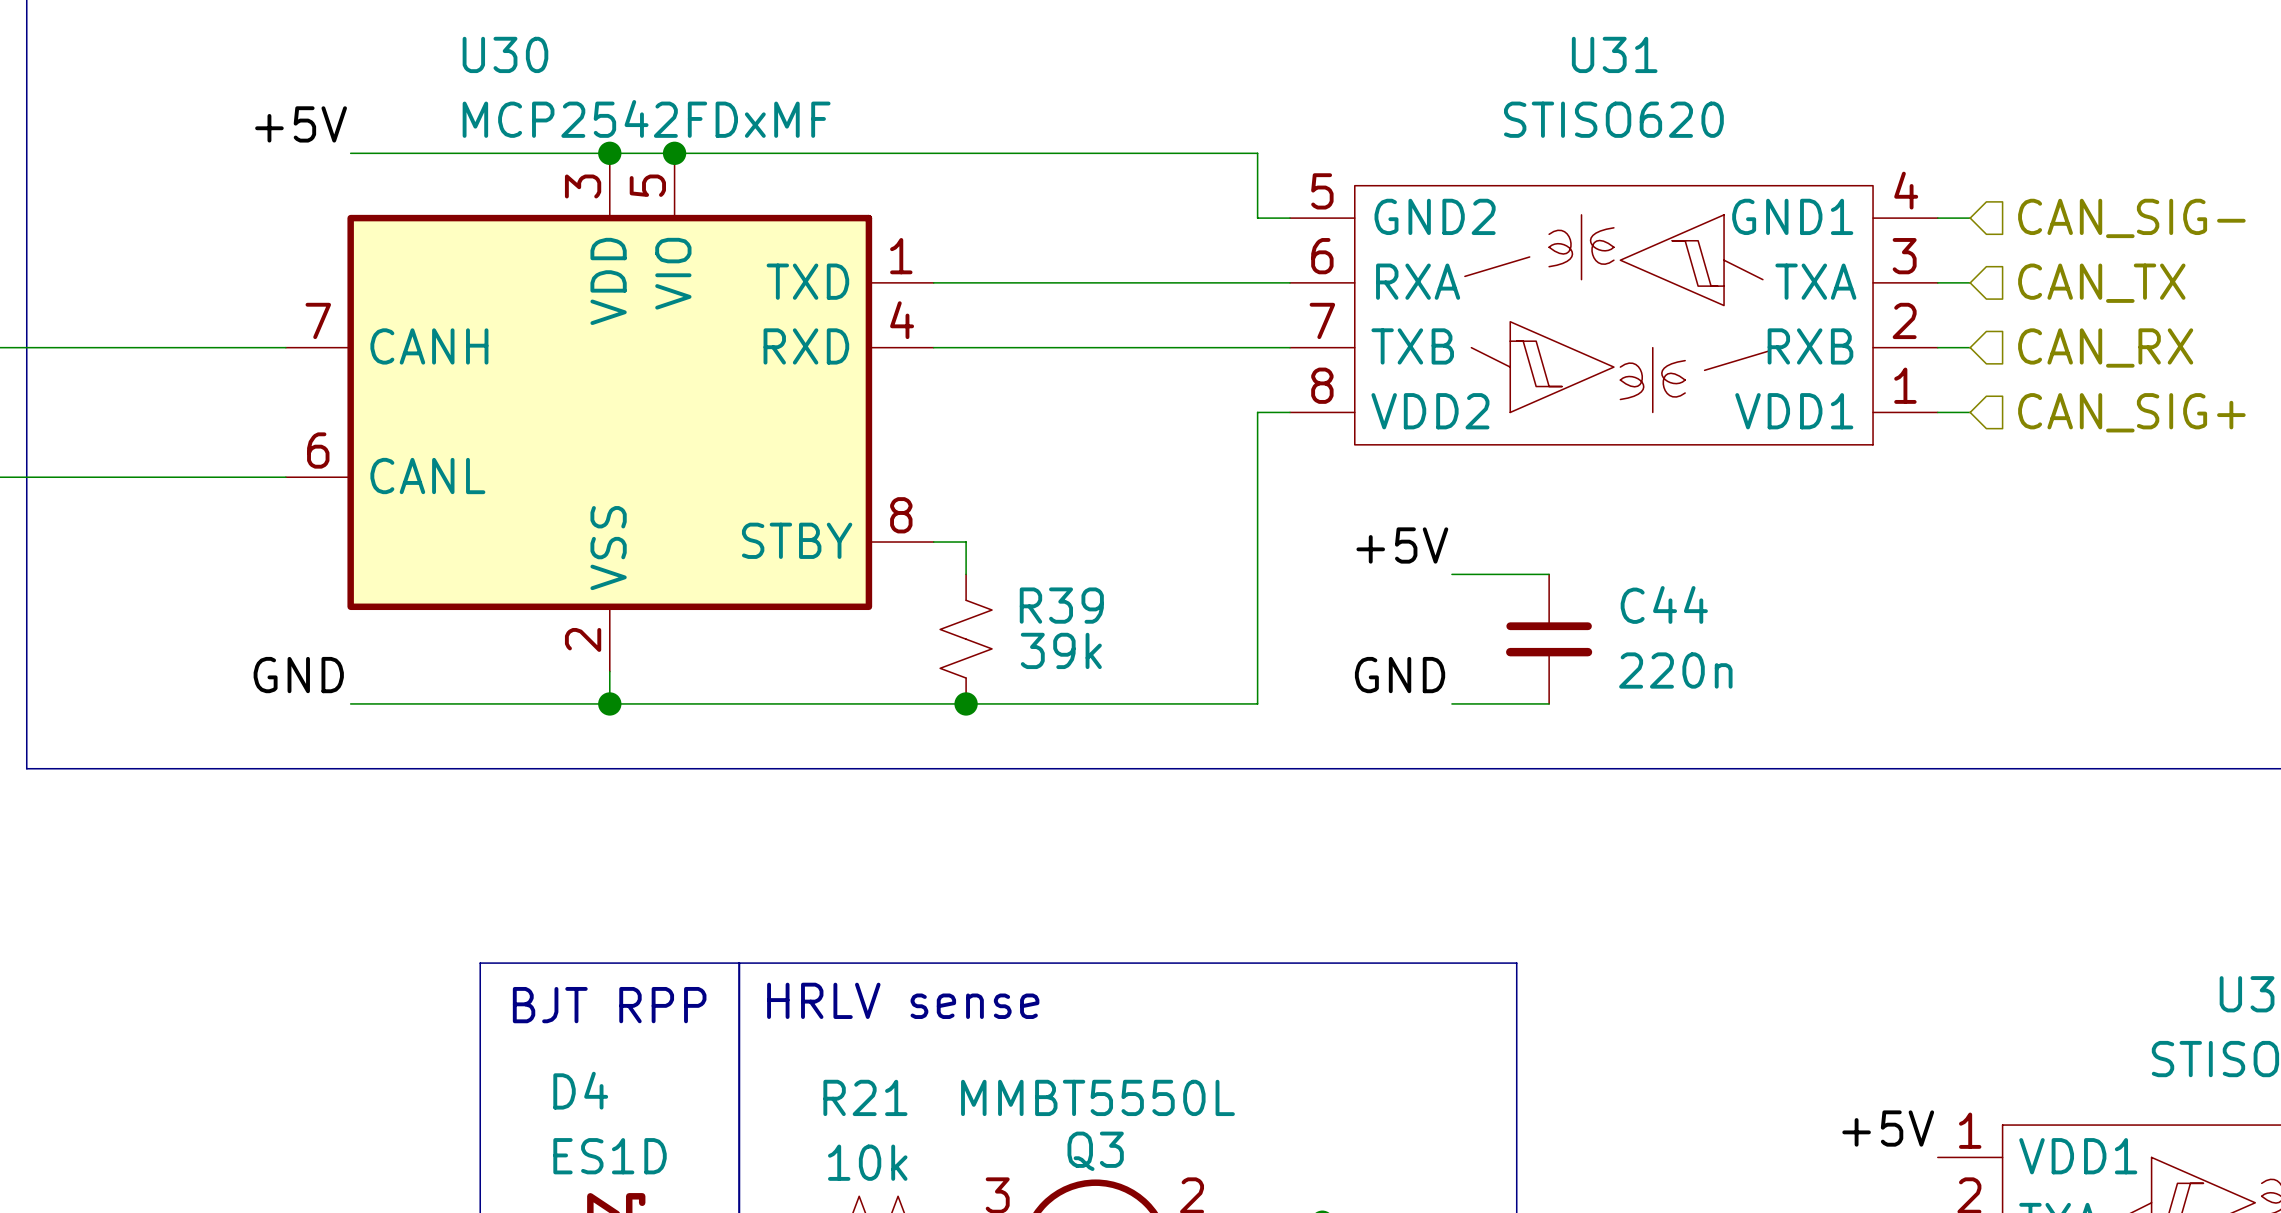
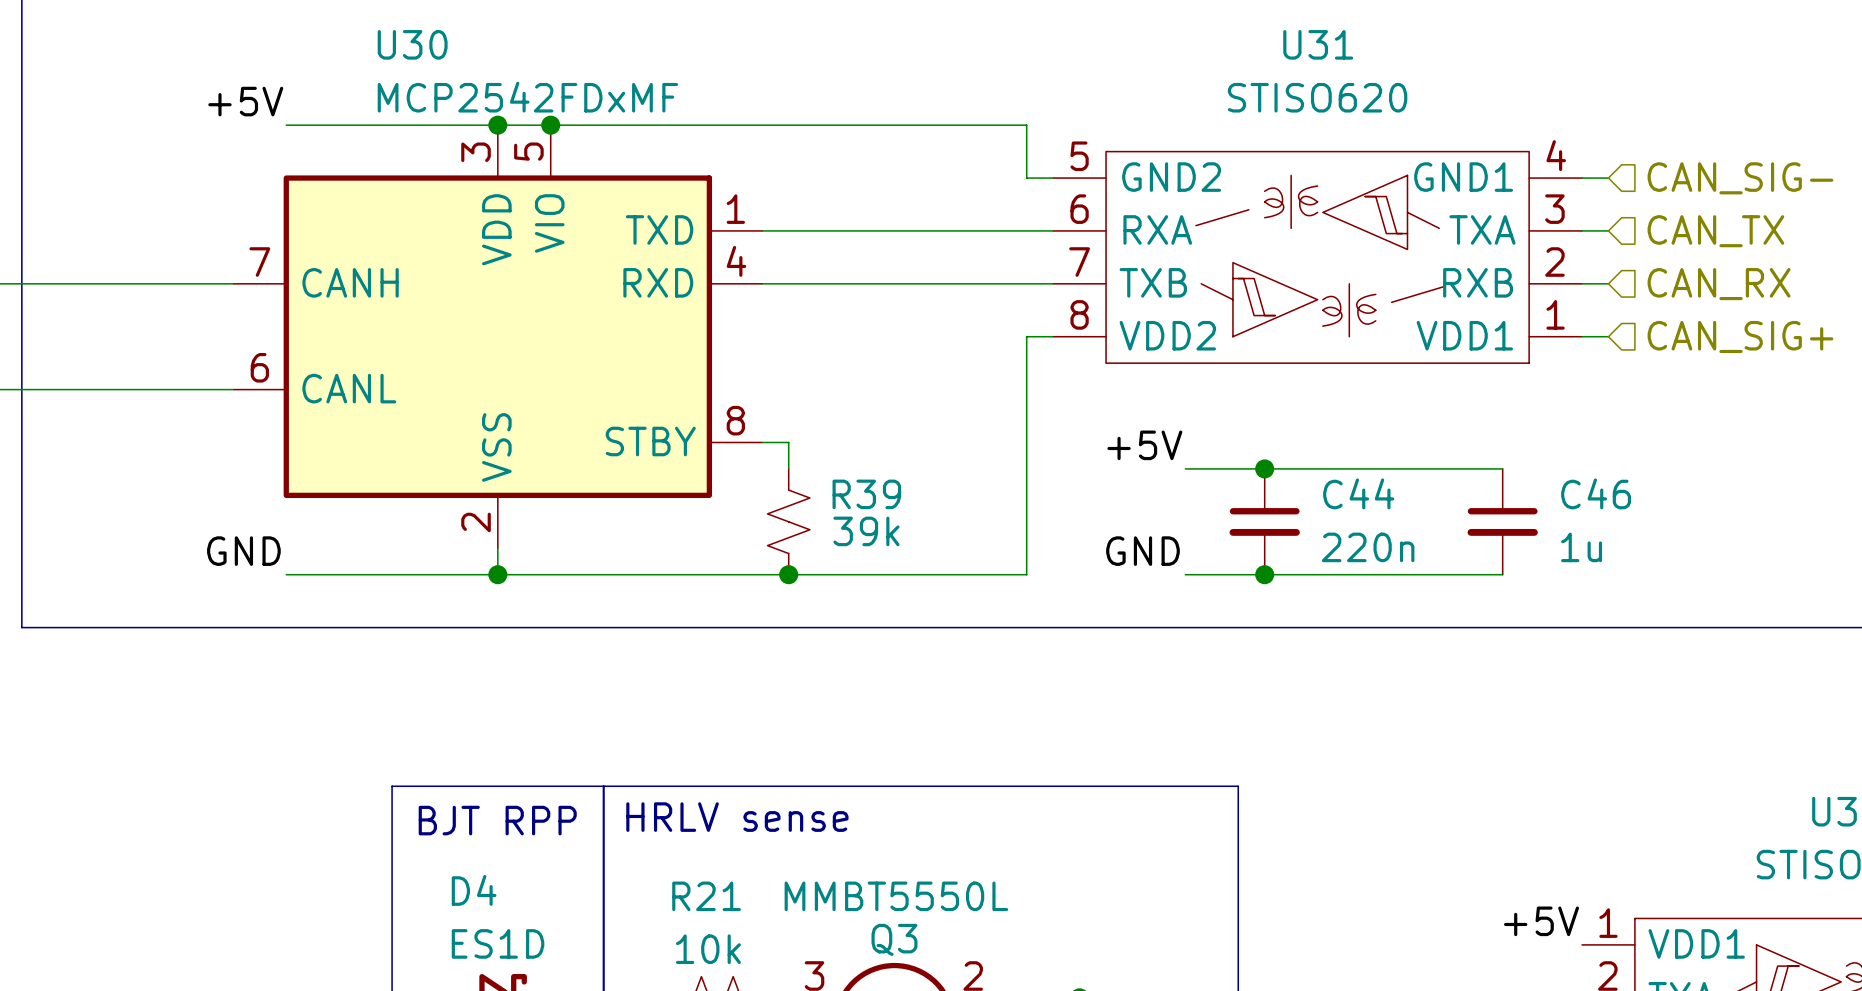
wire: none -> (1264, 468) (1502, 468)
junction: none -> (1264, 468)
C46: none -> 1u (1502, 521)
wire: none -> (1264, 574) (1502, 574)
junction: none -> (1264, 574)

